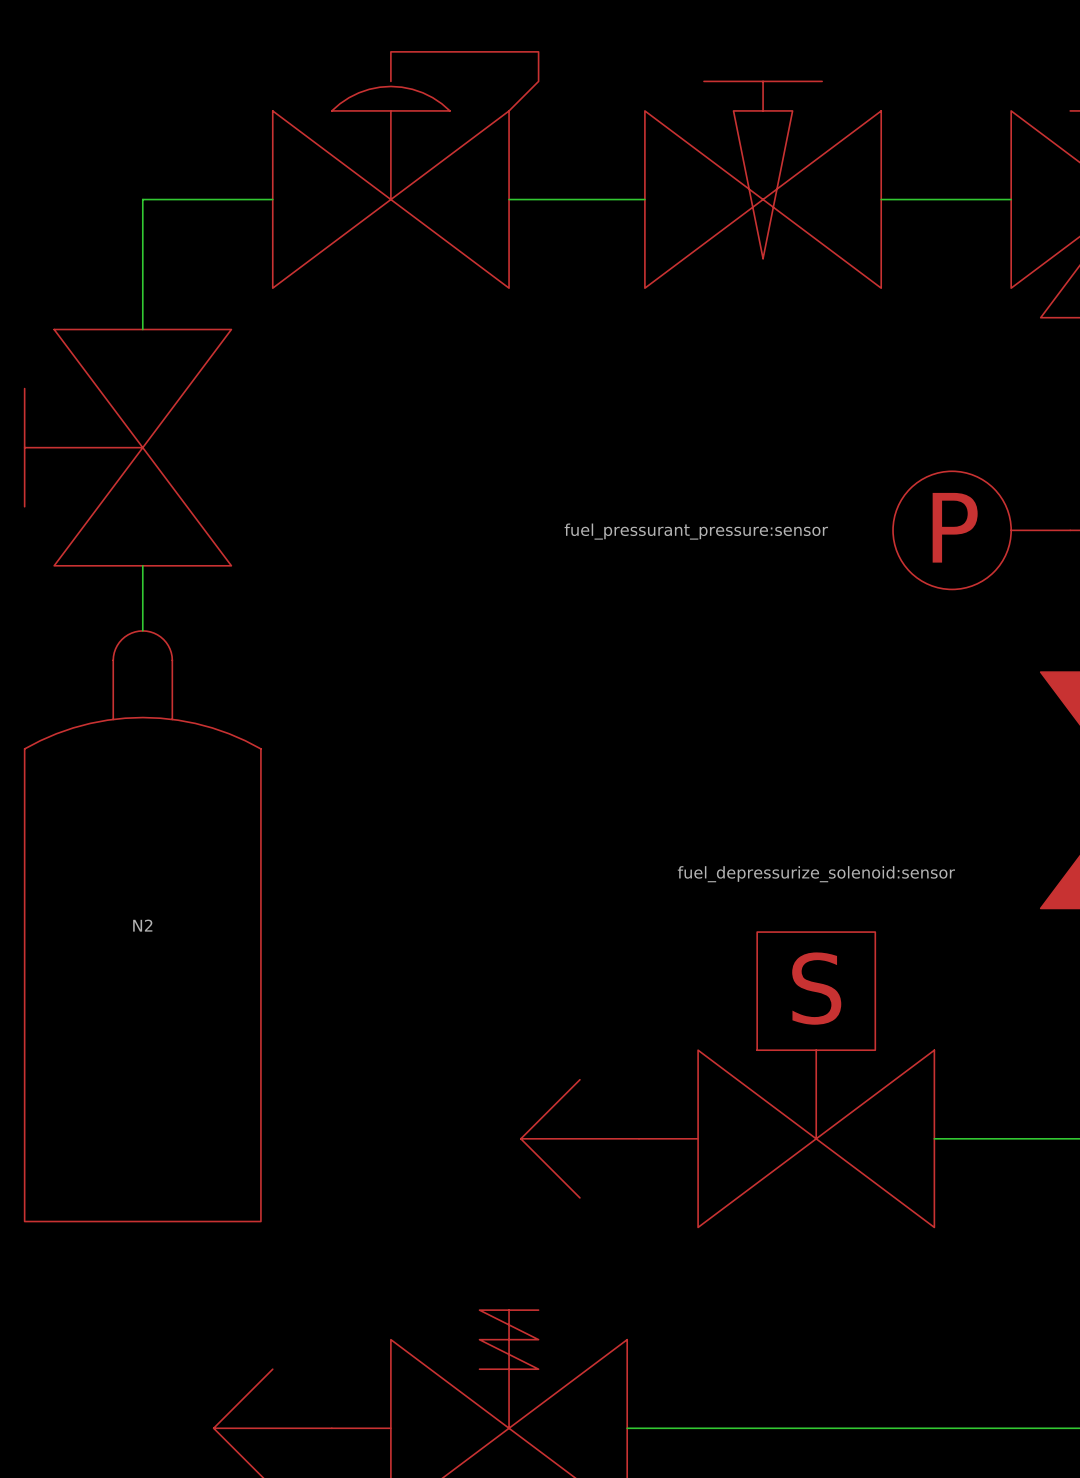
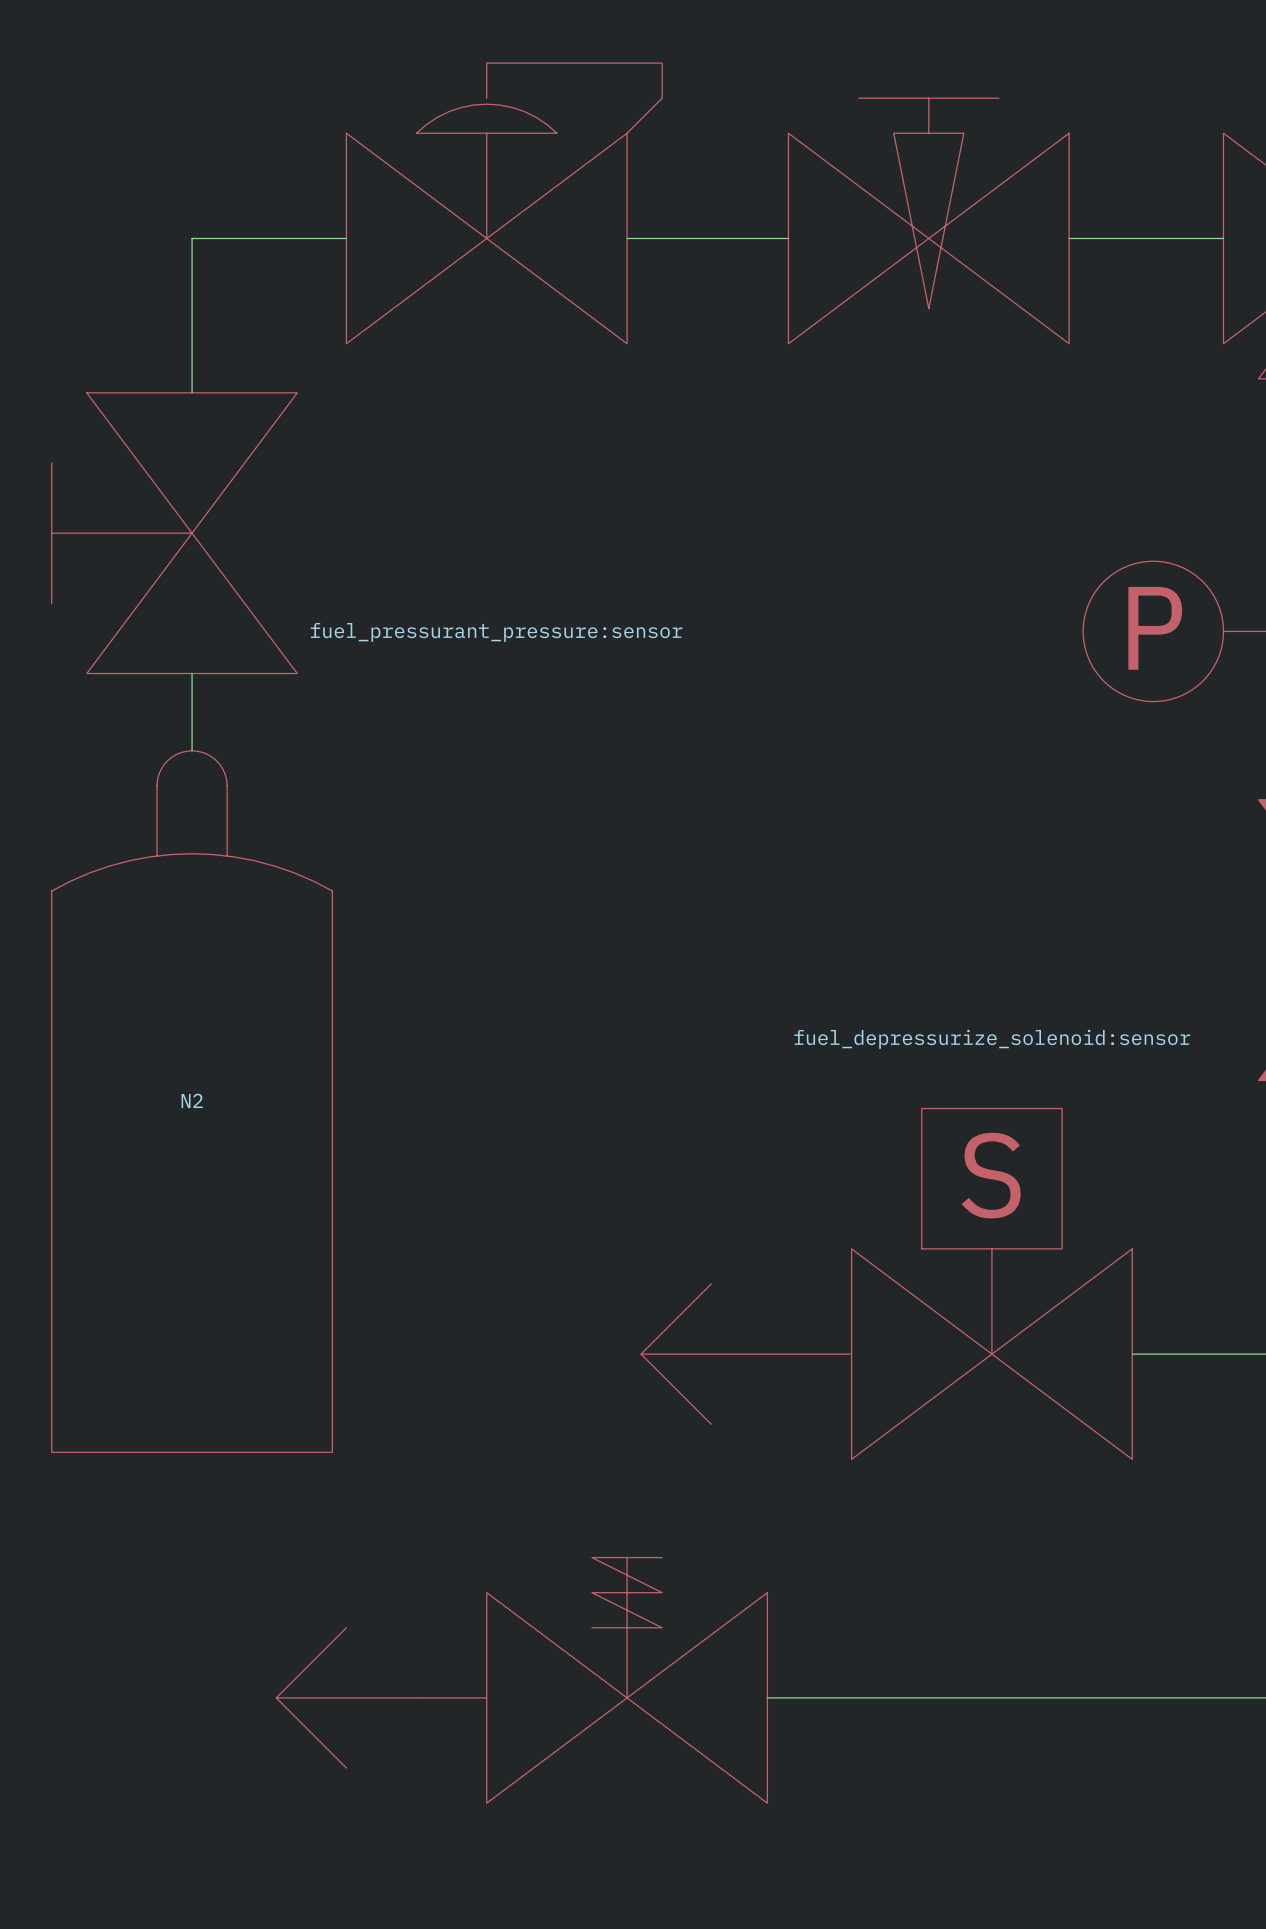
part value position: fuel_pressurant_pressure:sensor (696, 531) -> fuel_pressurant_pressure:sensor (496, 632)

